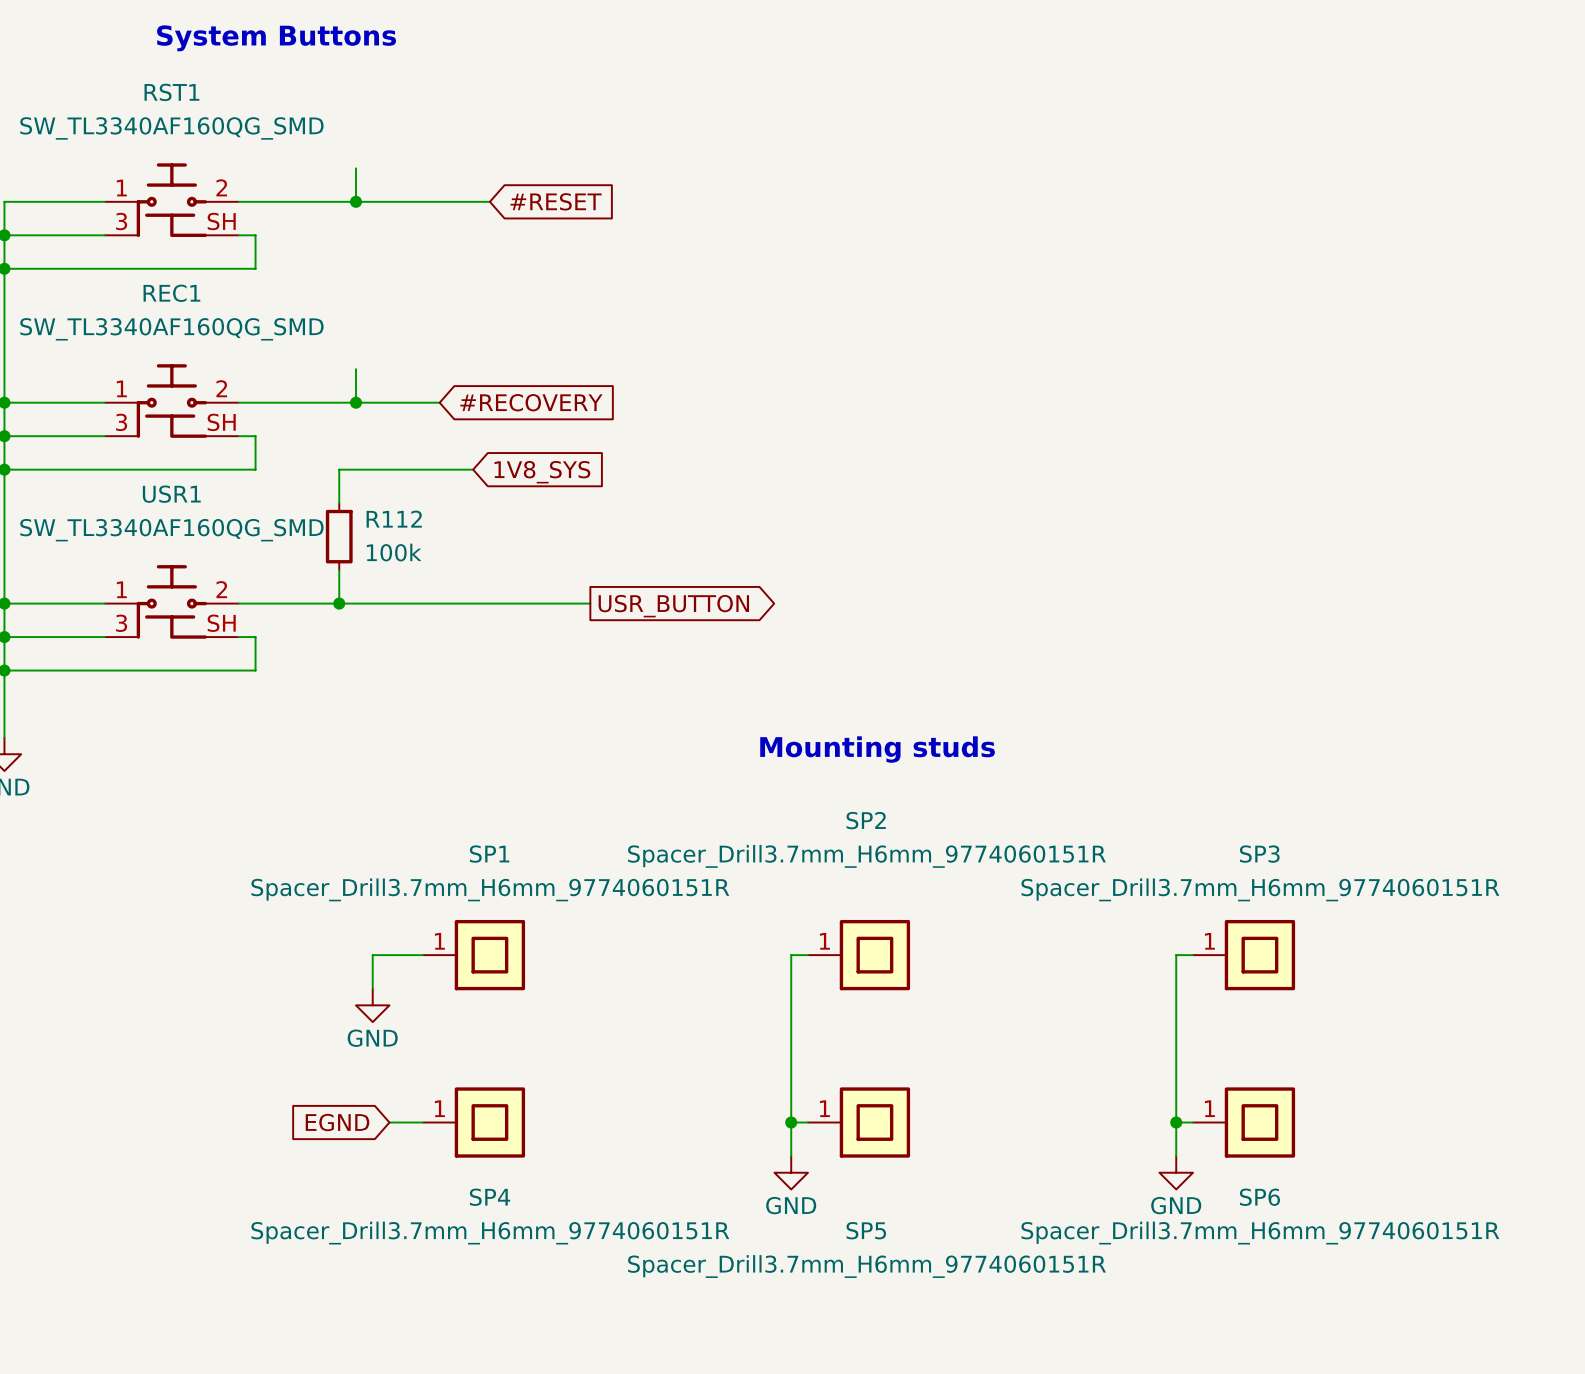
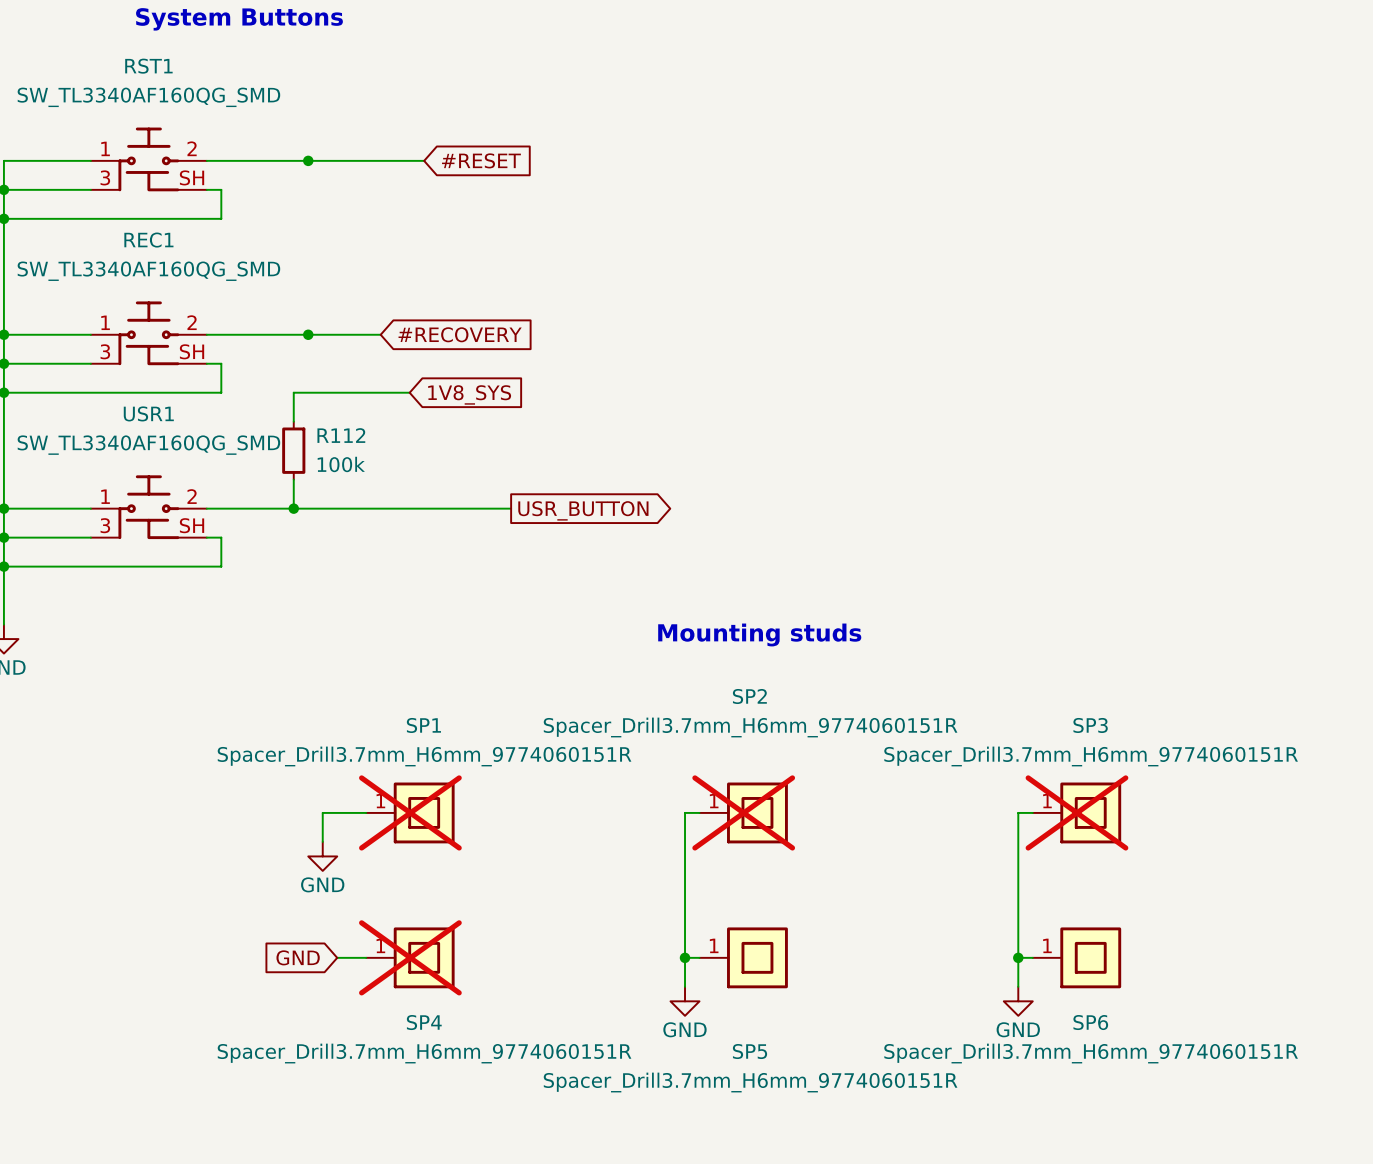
wire: (355, 168) (355, 201) -> none
wire: (355, 369) (355, 402) -> none
SP1 do-not-place cross: none -> (410, 812)
SP2 do-not-place cross: none -> (743, 812)
SP3 do-not-place cross: none -> (1076, 812)
global label: EGND (337, 1122) -> GND (298, 957)
SP4 do-not-place cross: none -> (410, 957)

